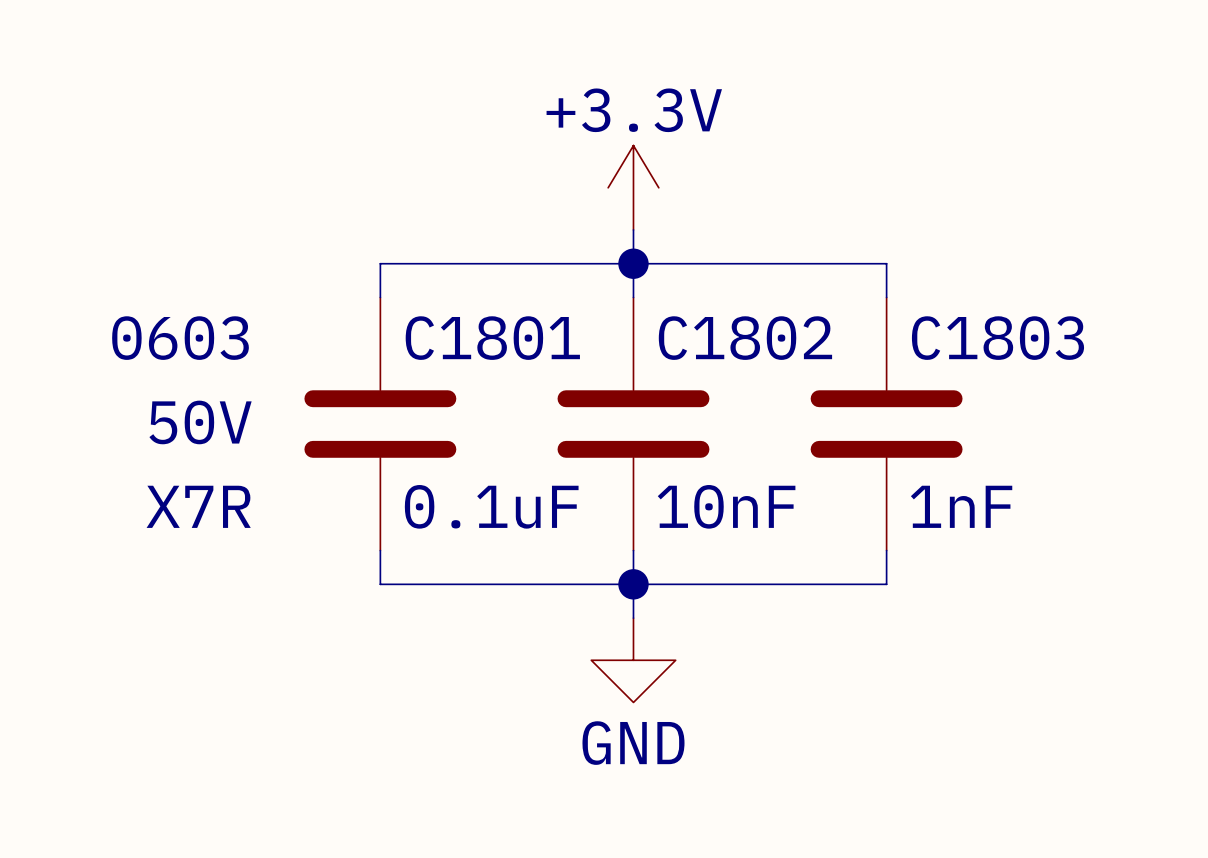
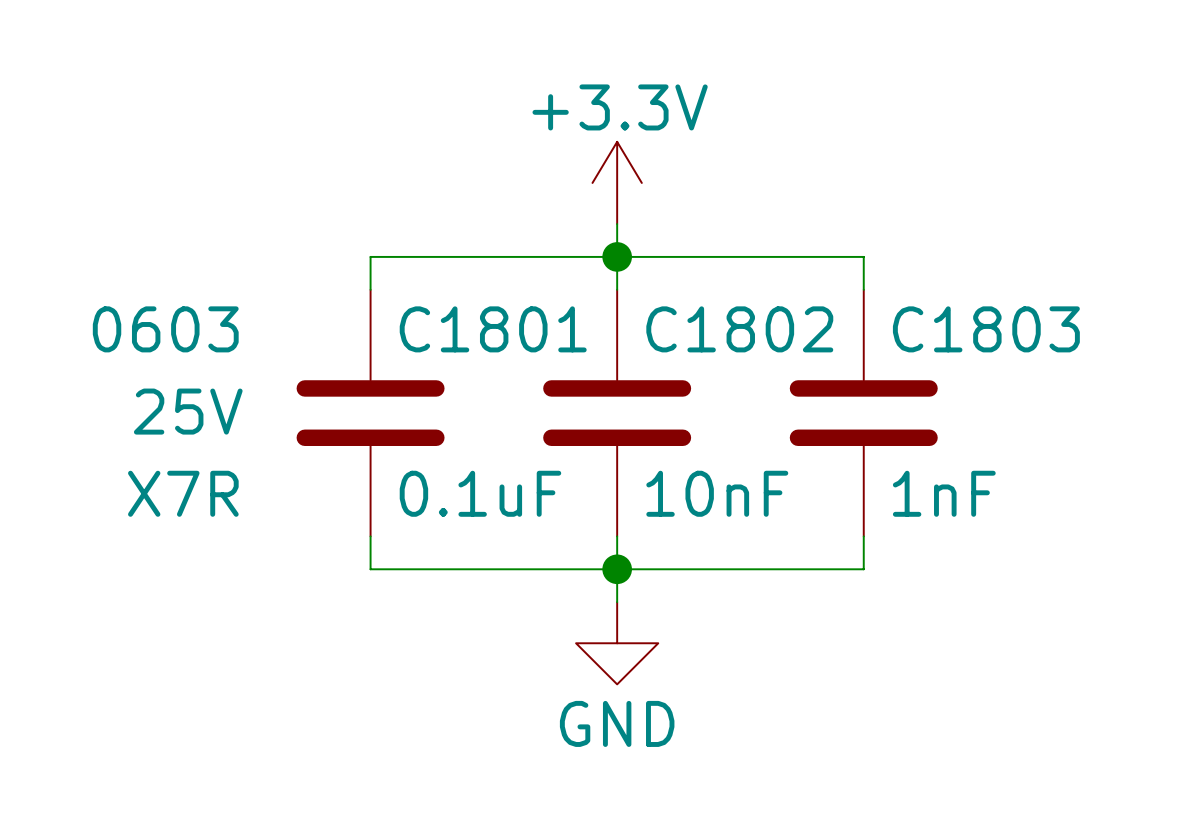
C1801 text: 50V (200, 422) -> 25V (188, 411)

